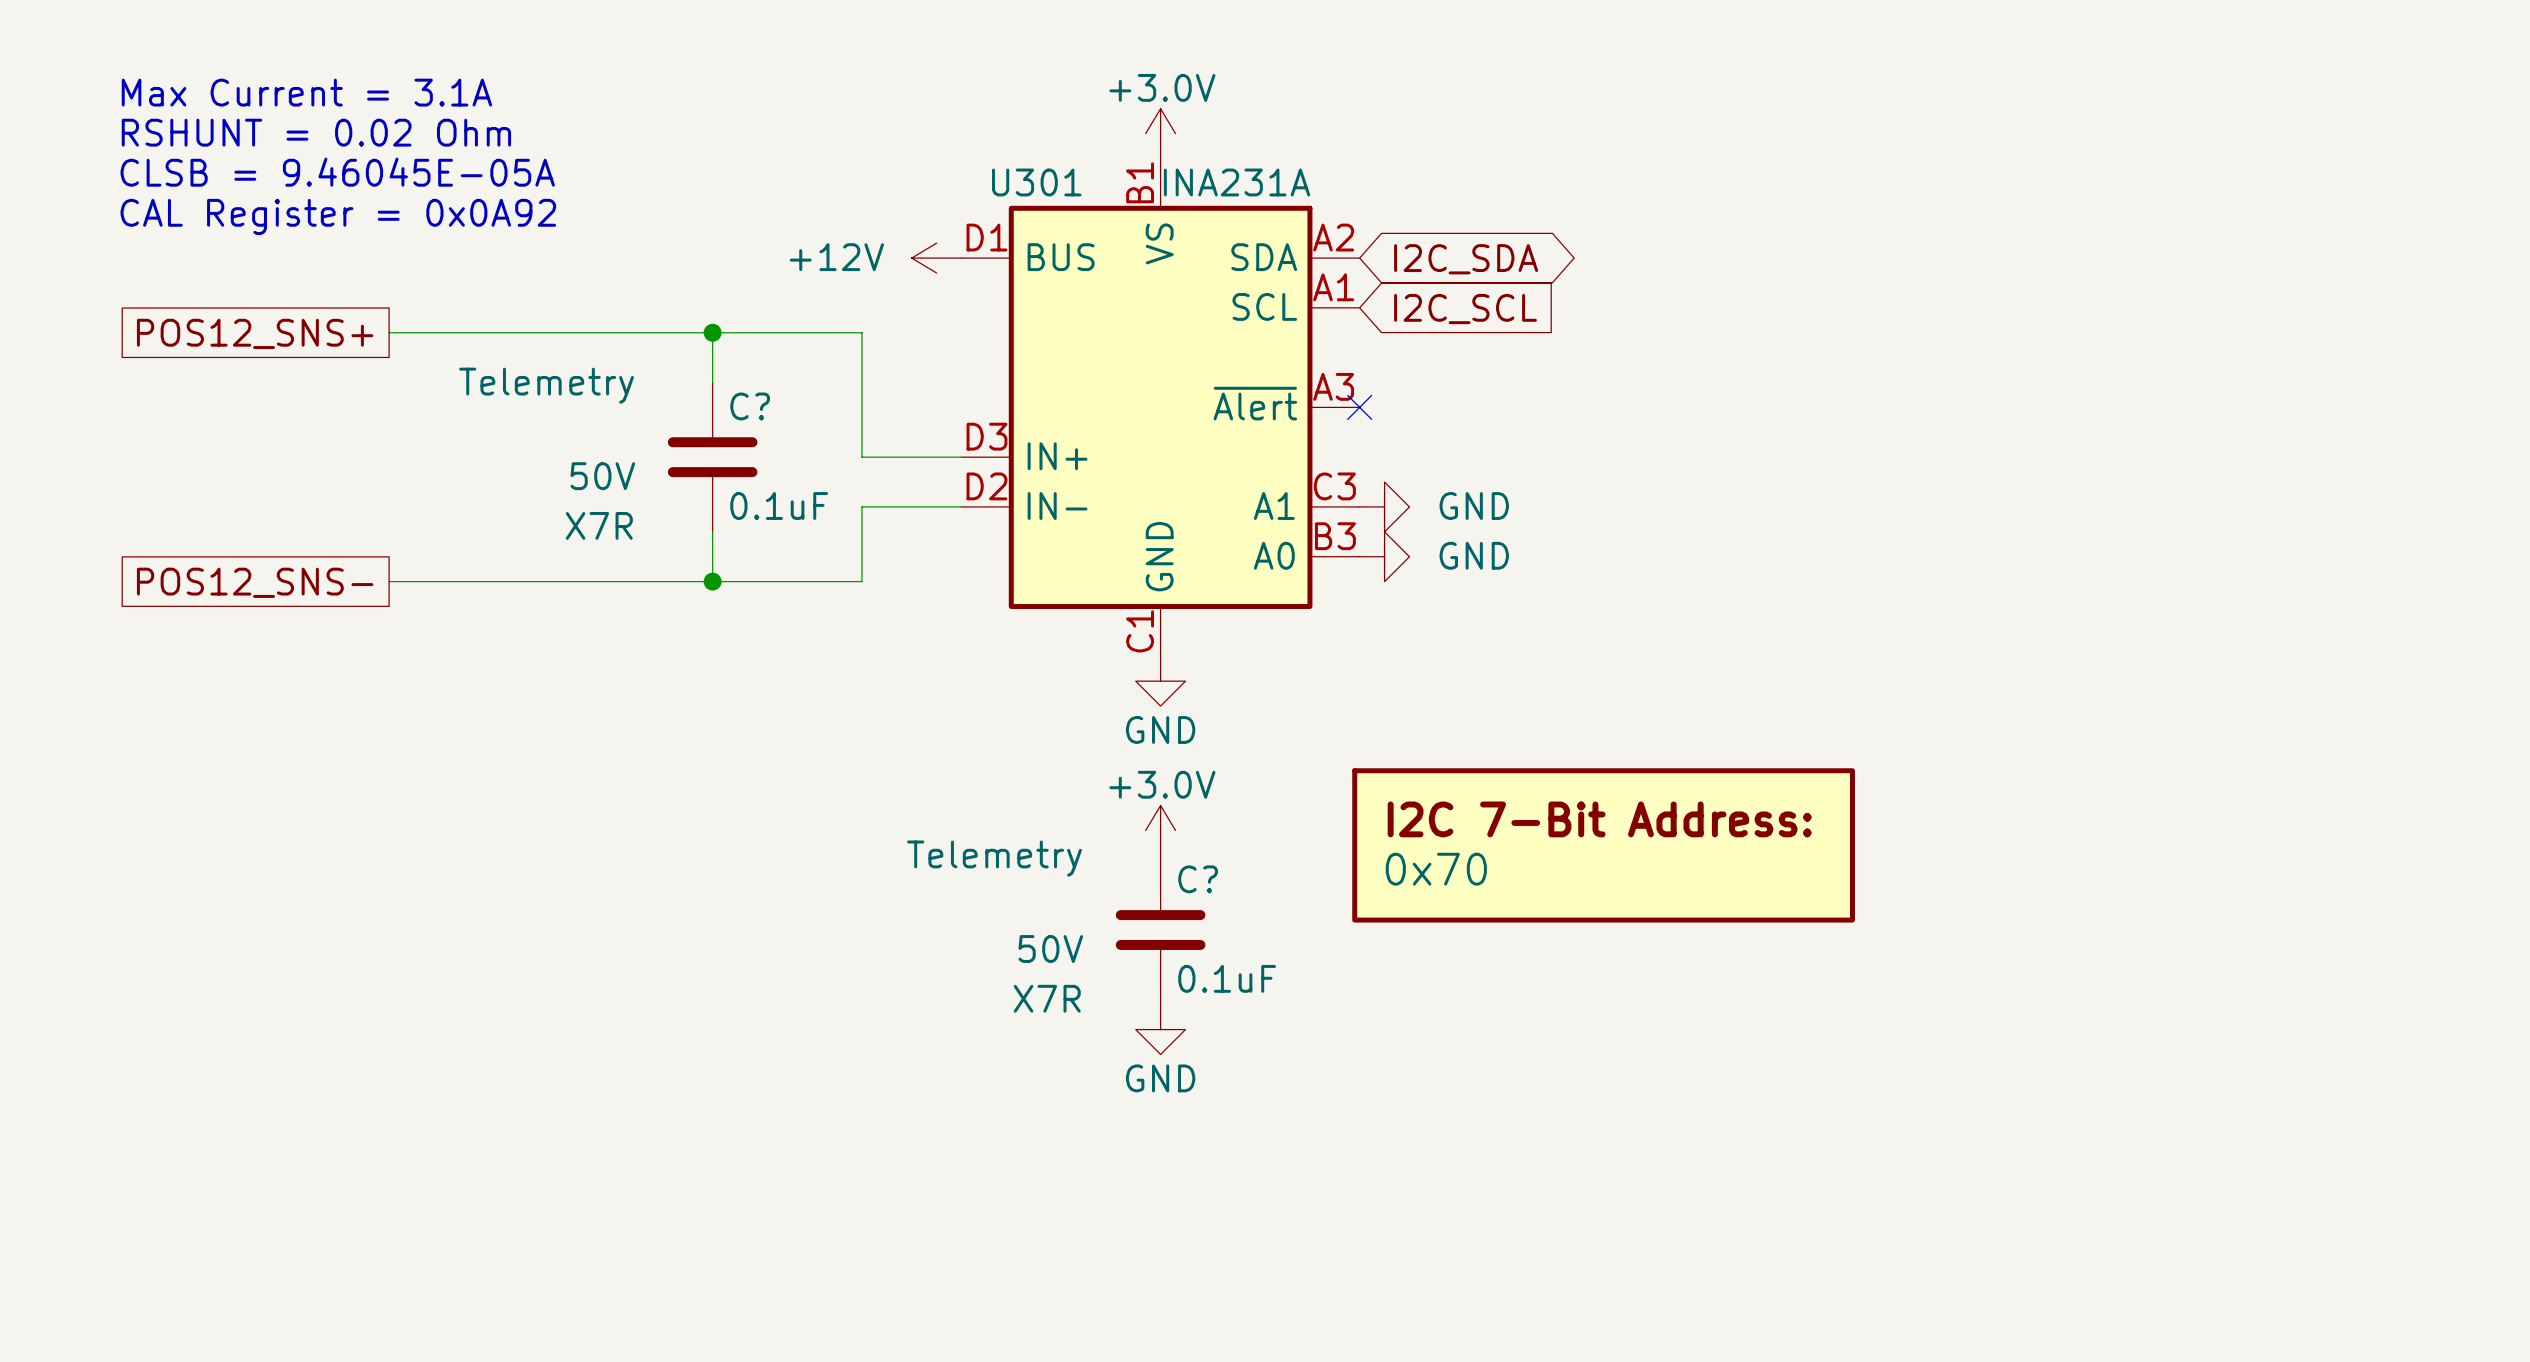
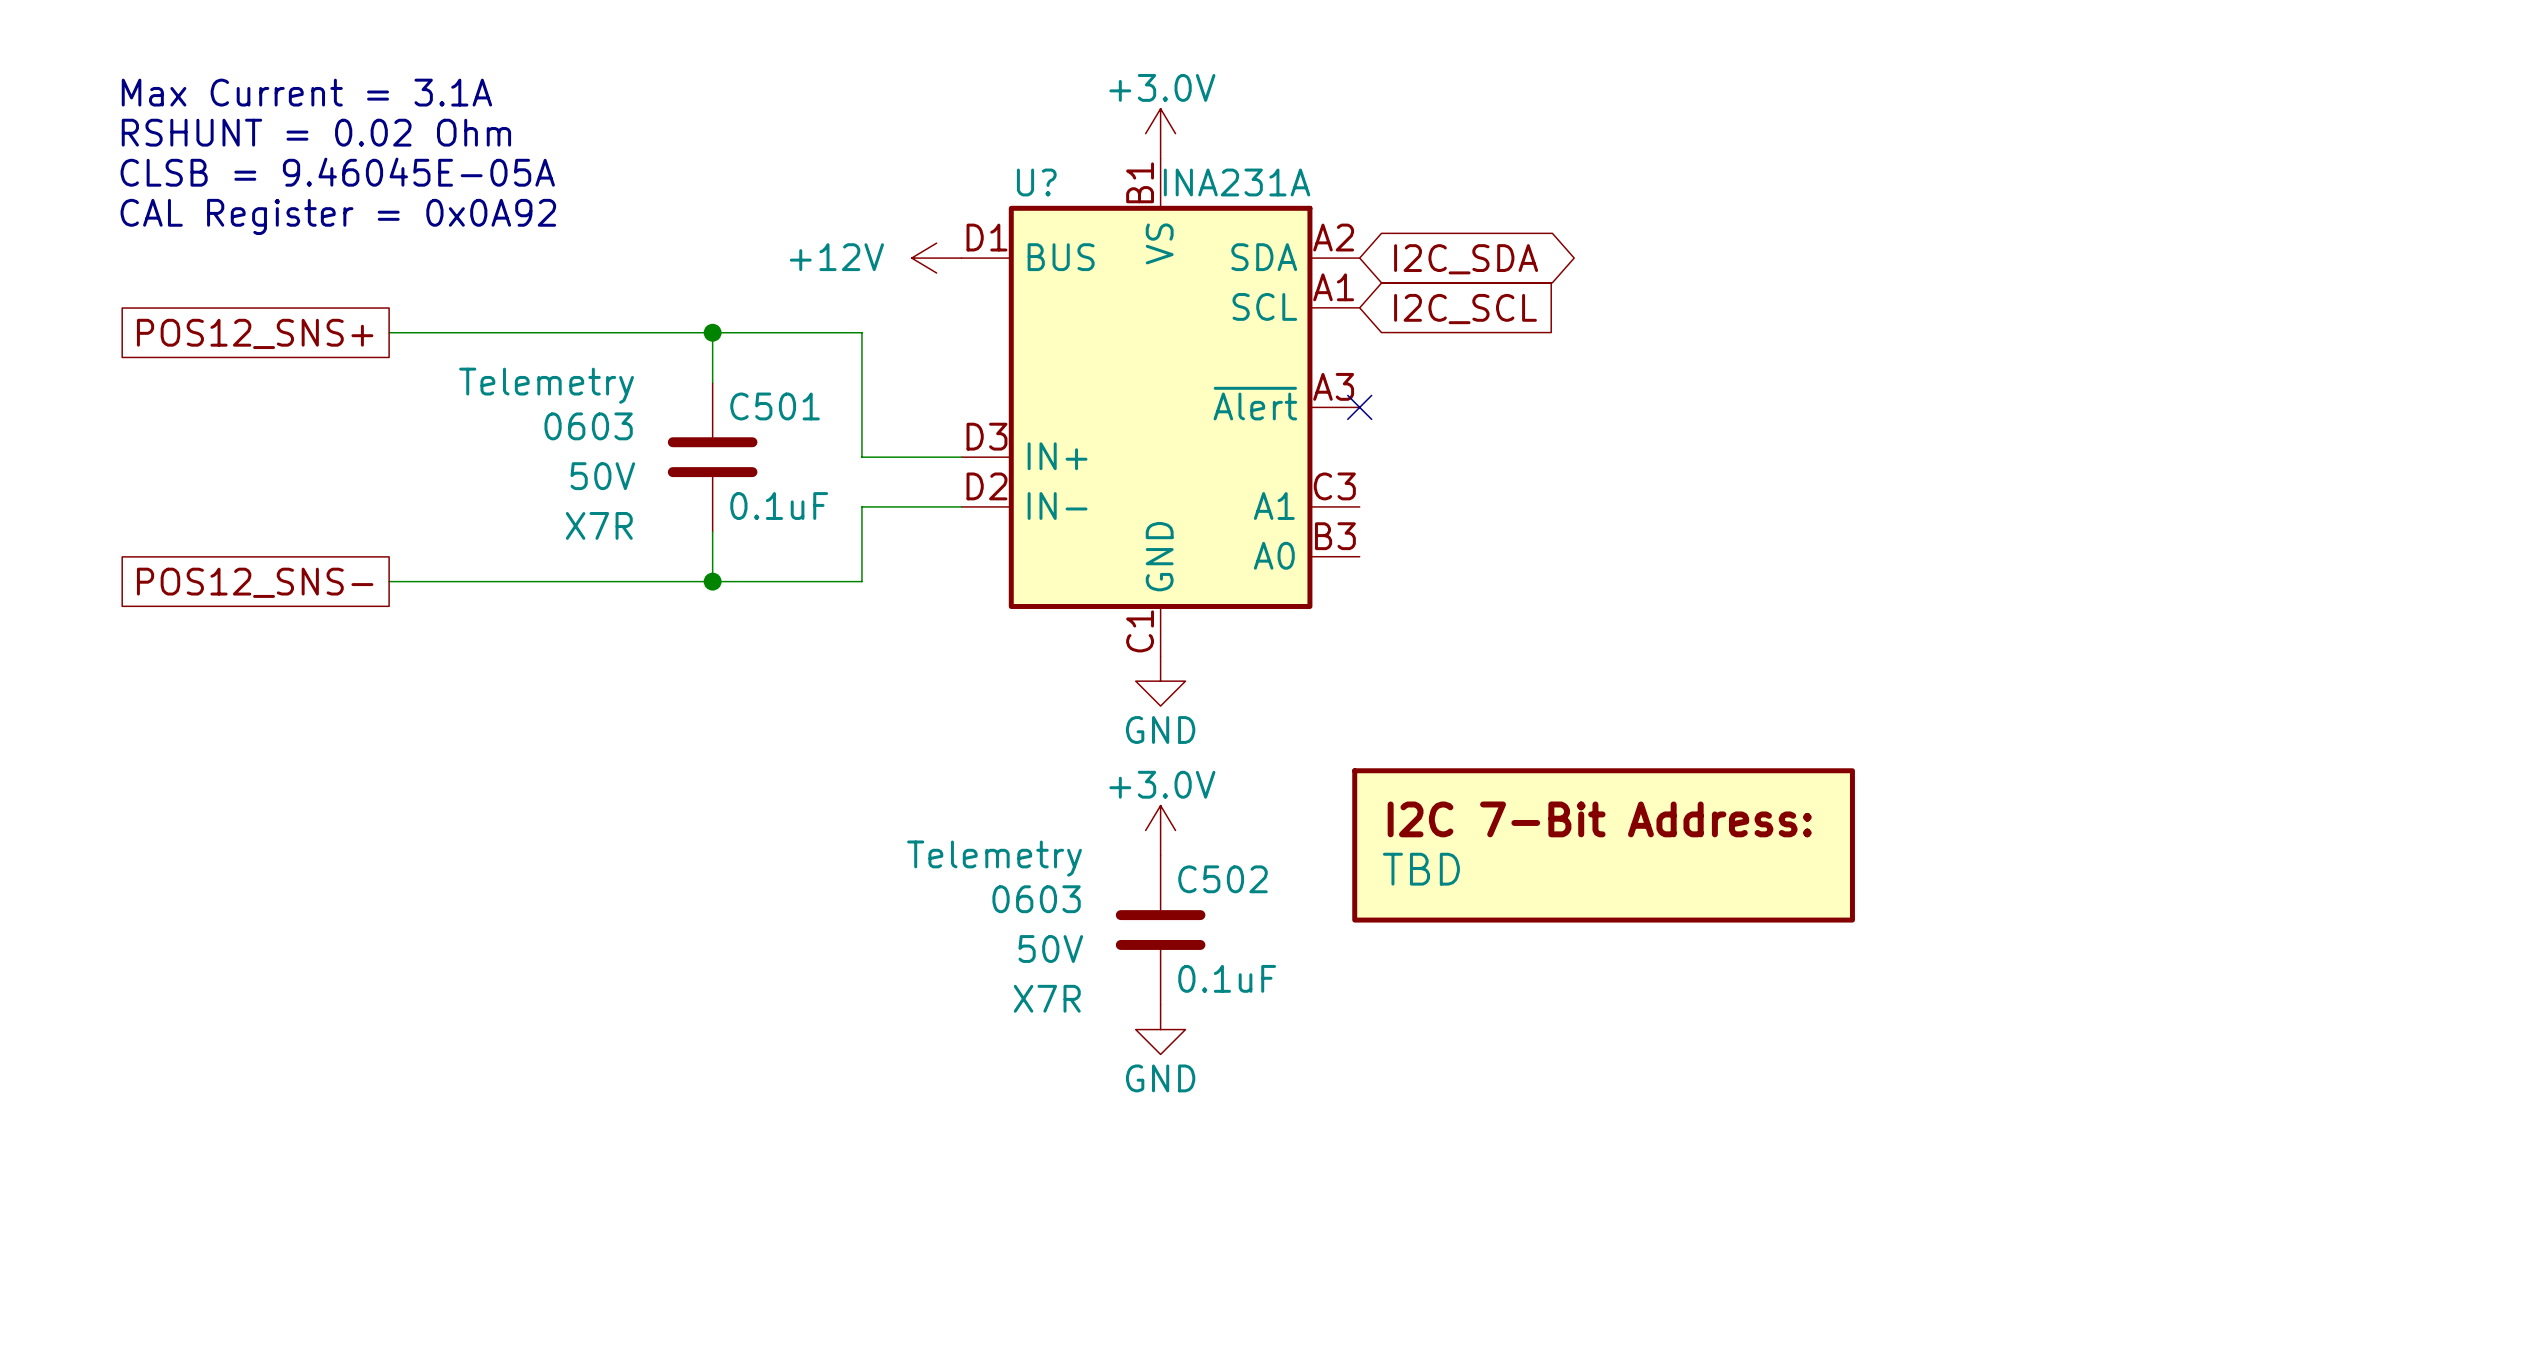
U301 name: U301 (1036, 182) -> U? (1036, 182)
C? name: C? (750, 406) -> C501 (775, 406)
C? text: none -> 0603 (588, 426)
power symbol: GND (1384, 506) -> none
power symbol: GND (1384, 556) -> none
part value: 0x70 (1436, 869) -> TBD (1421, 869)
C? name: C? (1198, 879) -> C502 (1223, 879)
C? text: none -> 0603 (1036, 899)

